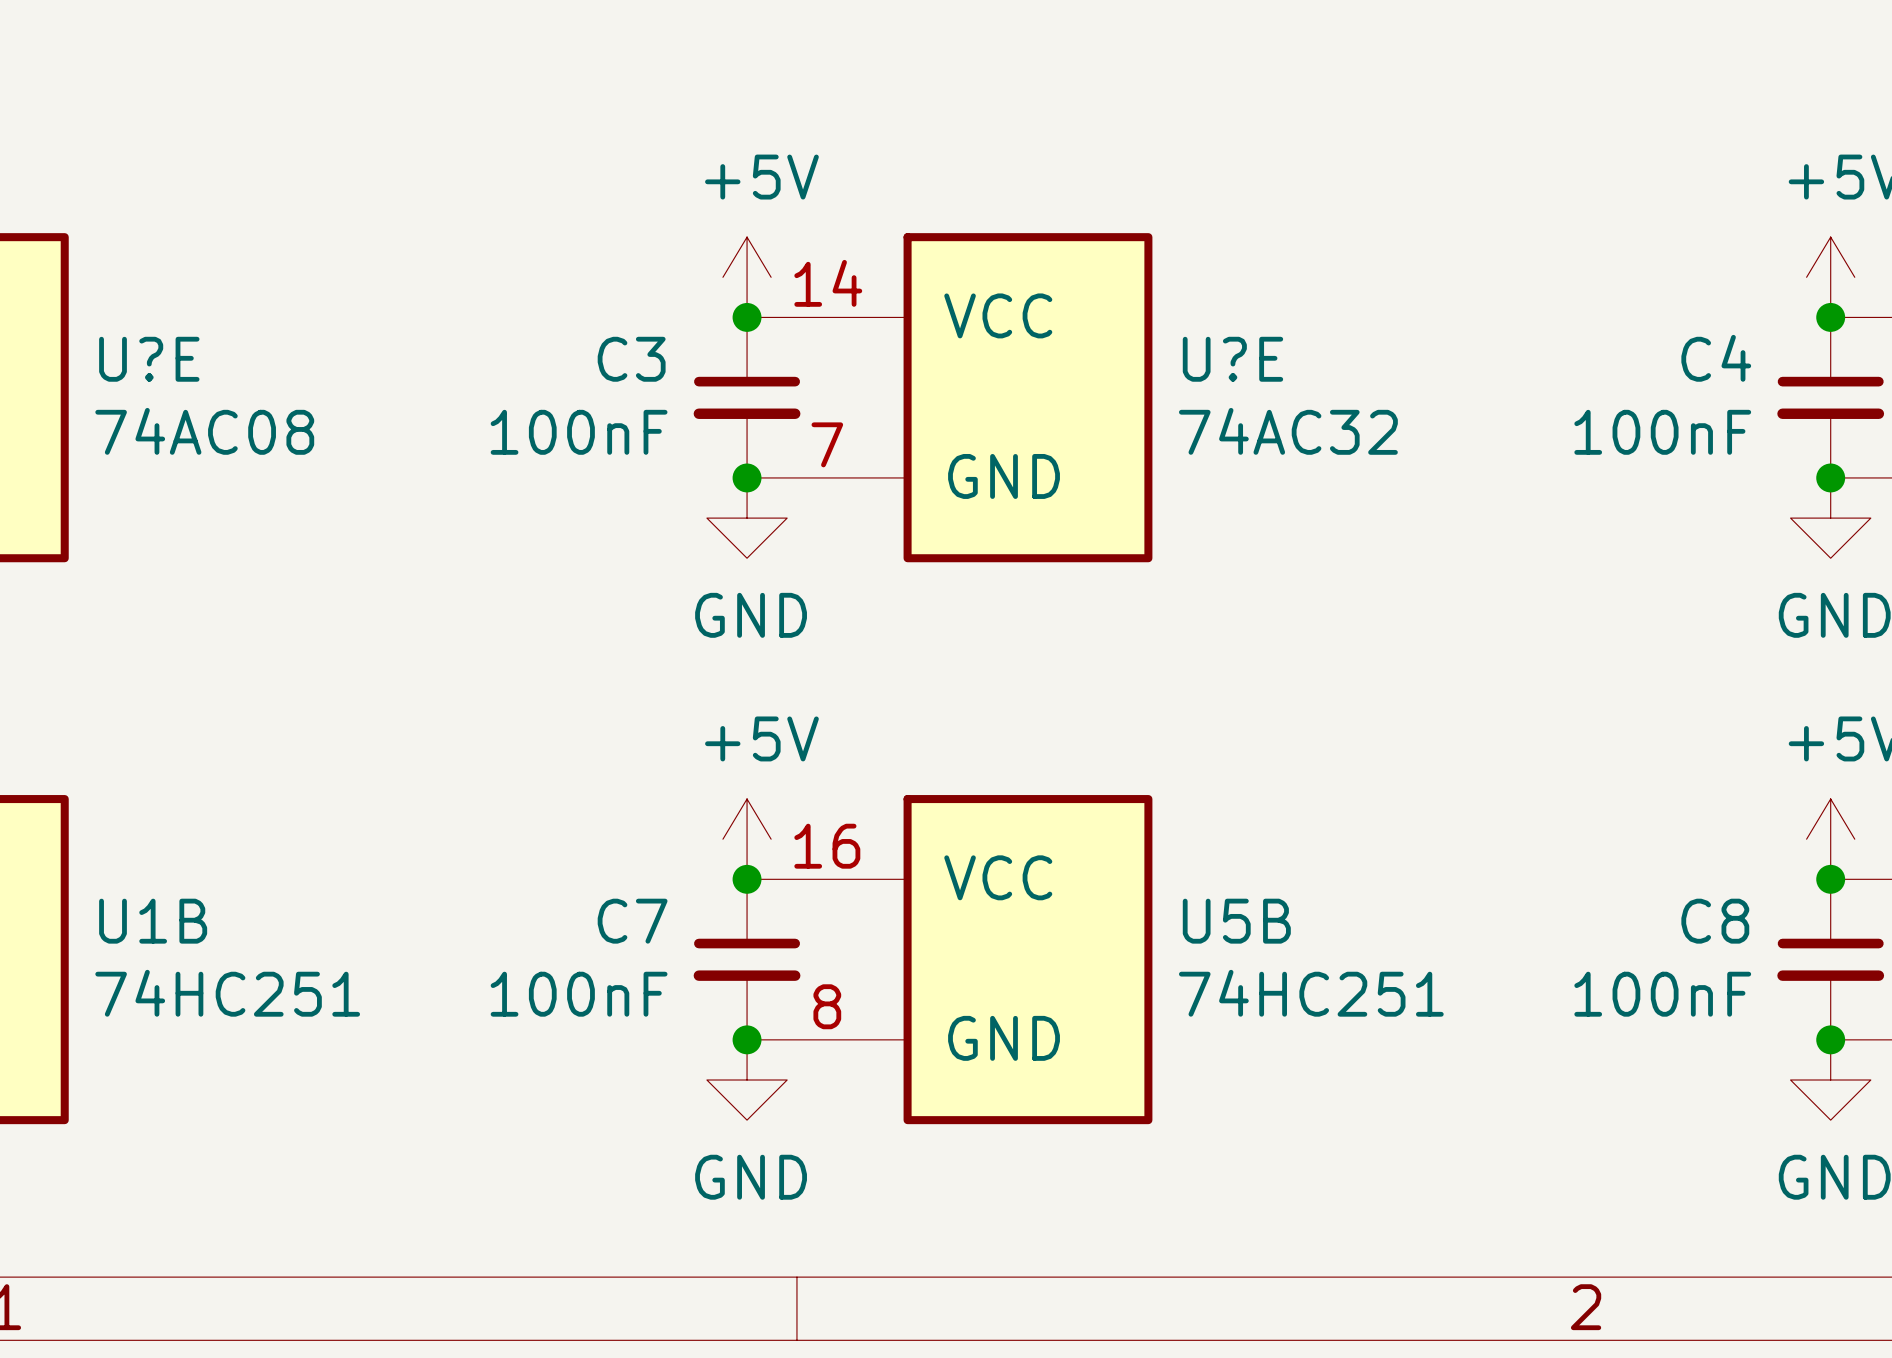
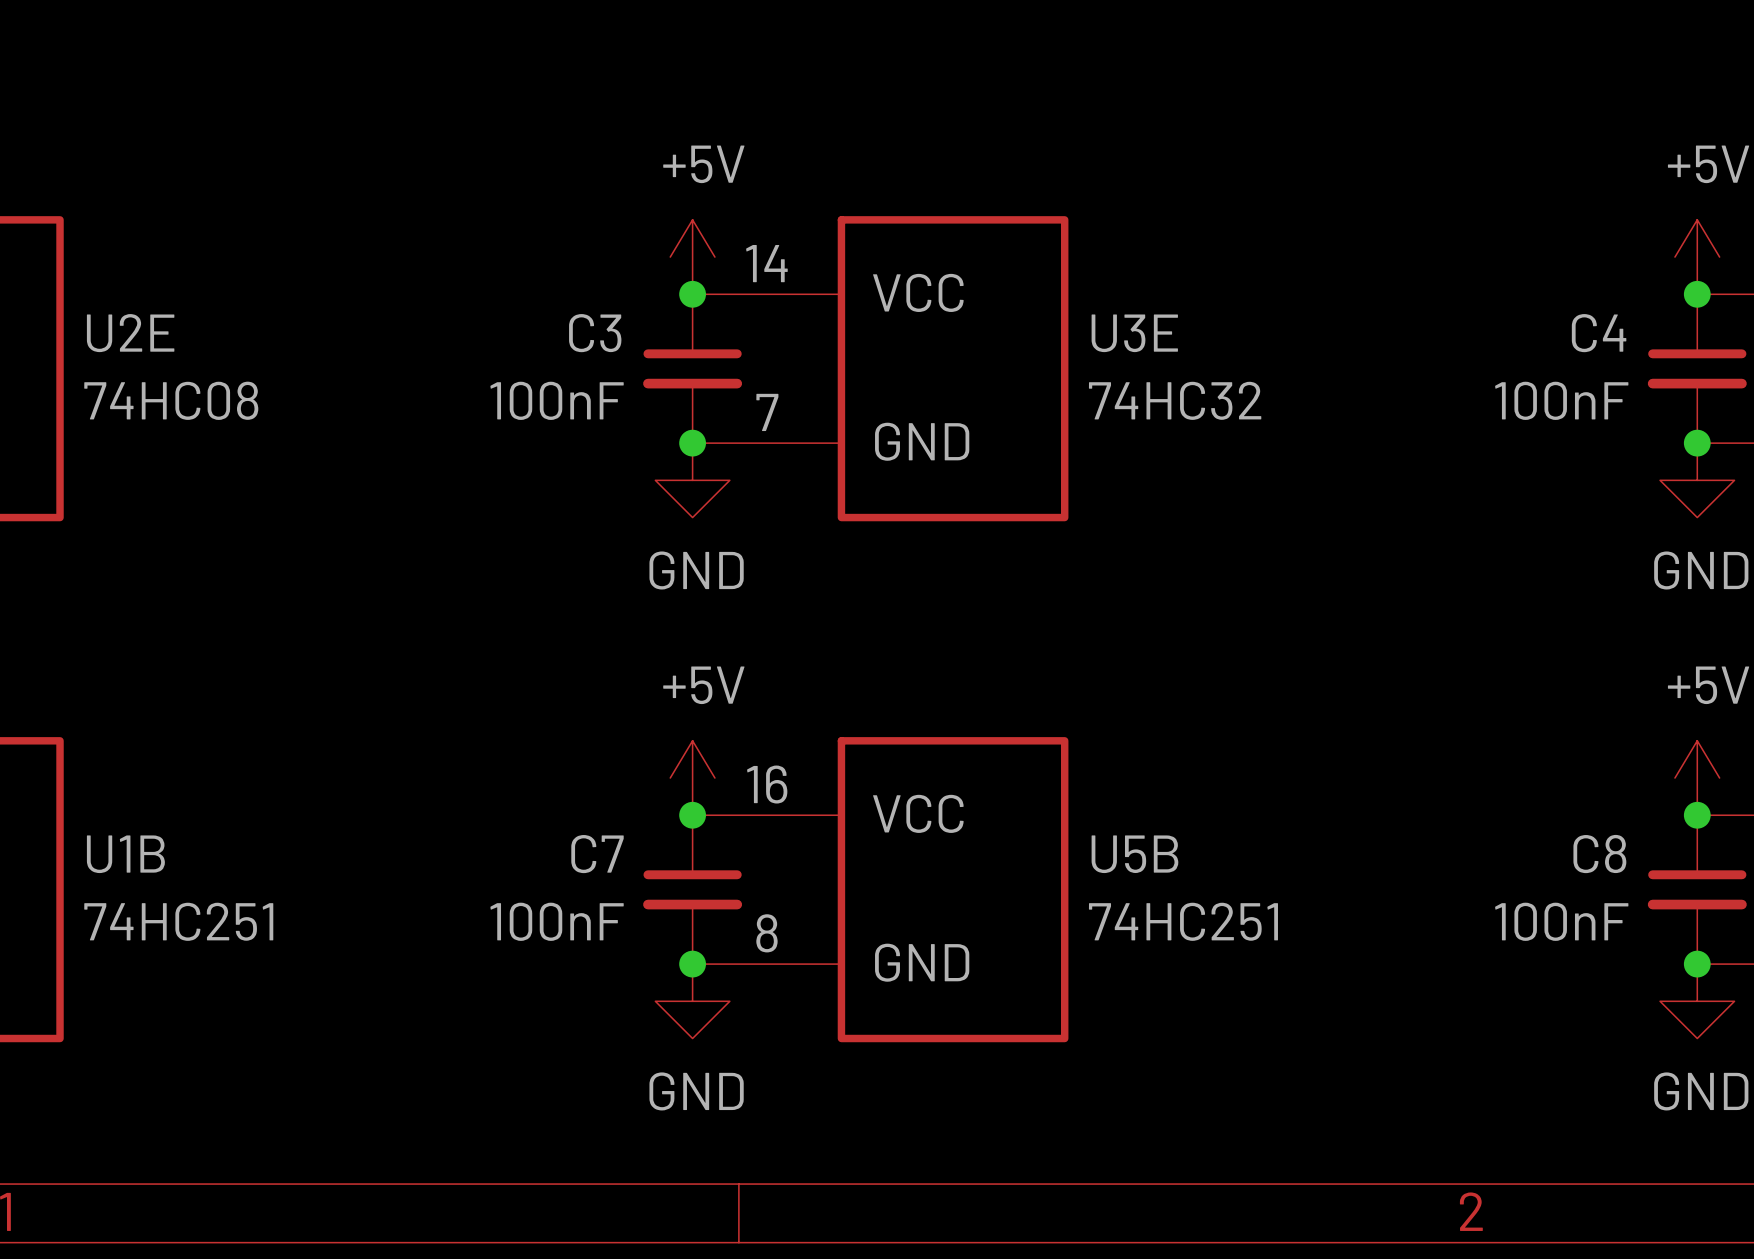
U?E name: U?E (149, 359) -> U2E (130, 333)
U?E name: U?E (1232, 359) -> U3E (1134, 333)
U?E value: 74AC08 (204, 431) -> 74HC08 (171, 400)
U?E value: 74AC32 (1288, 431) -> 74HC32 (1175, 400)

